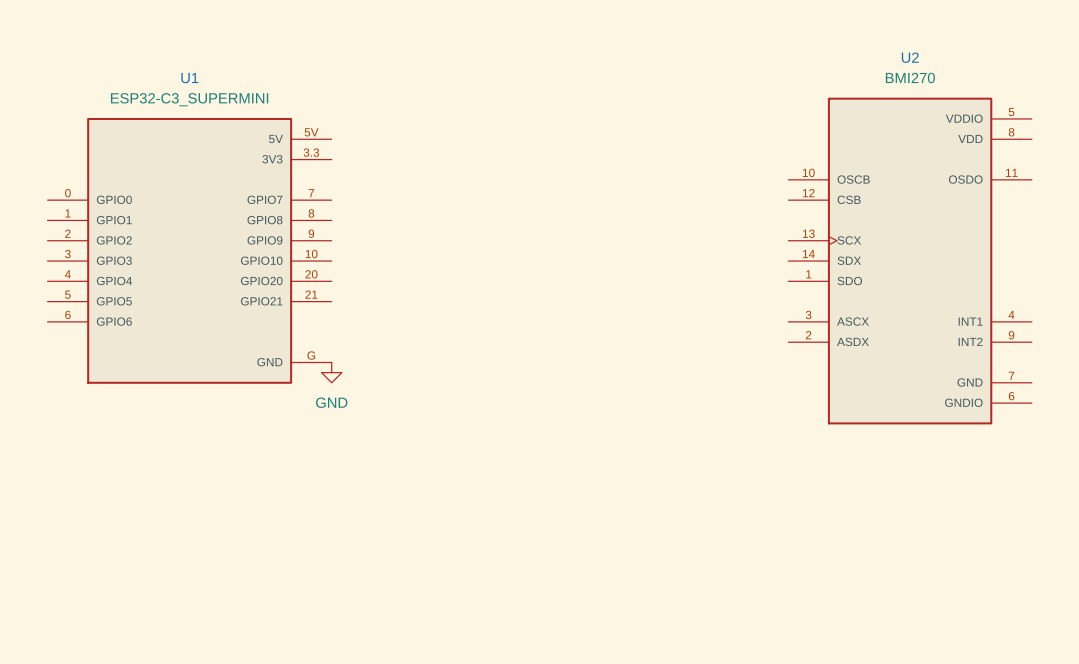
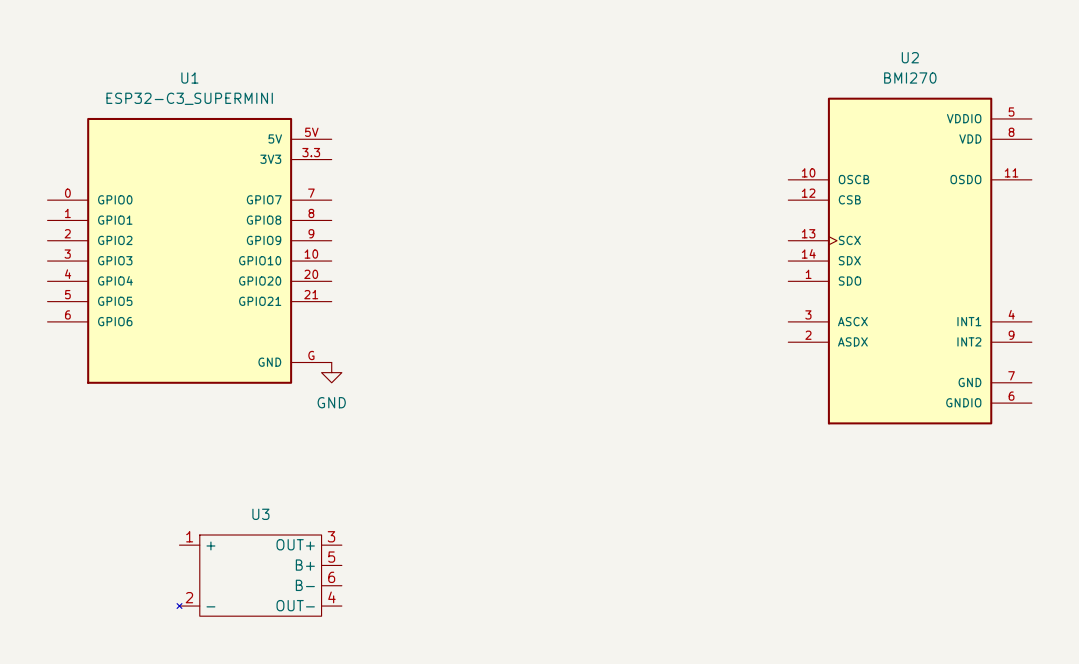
U3: none -> (259, 575)

